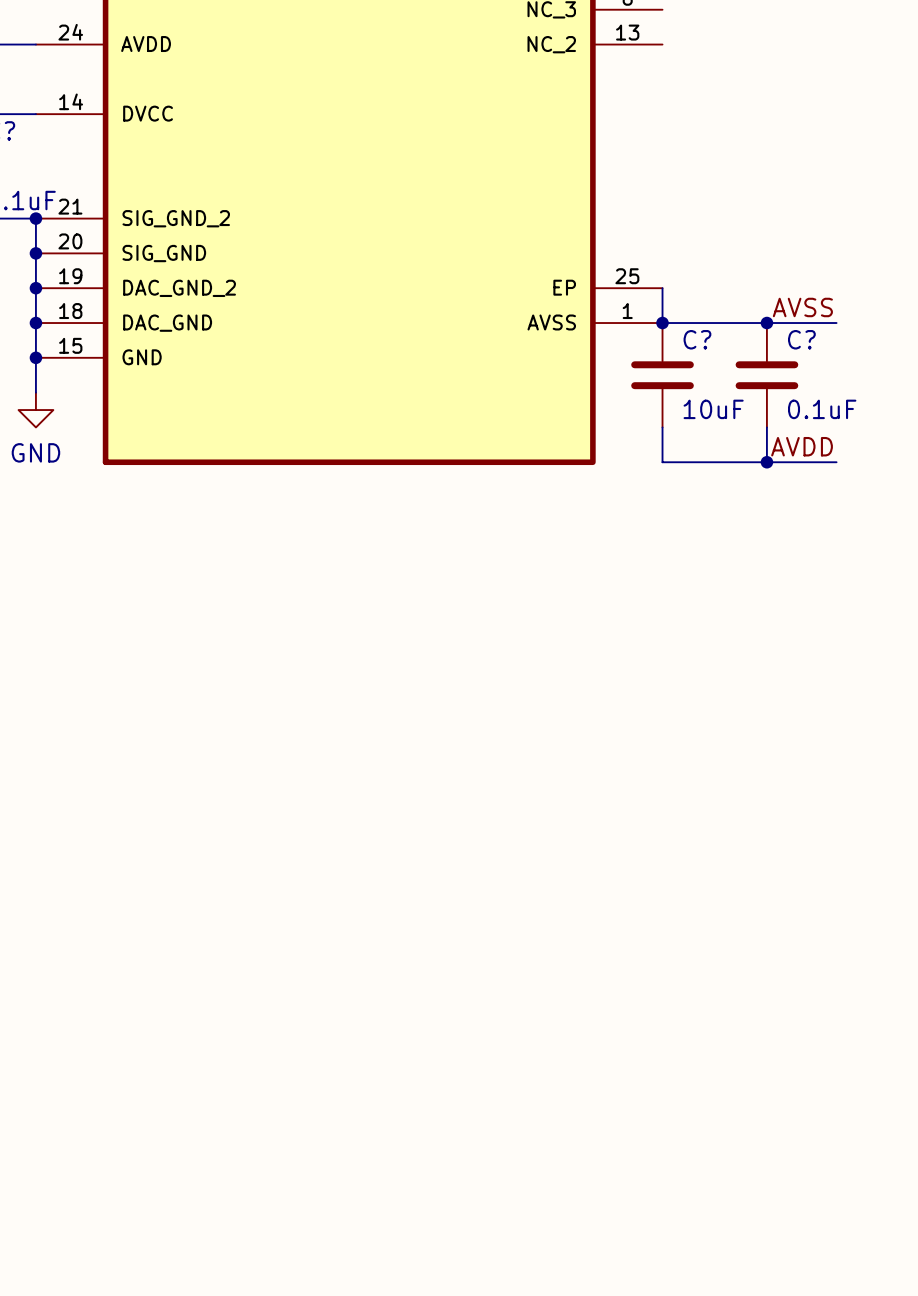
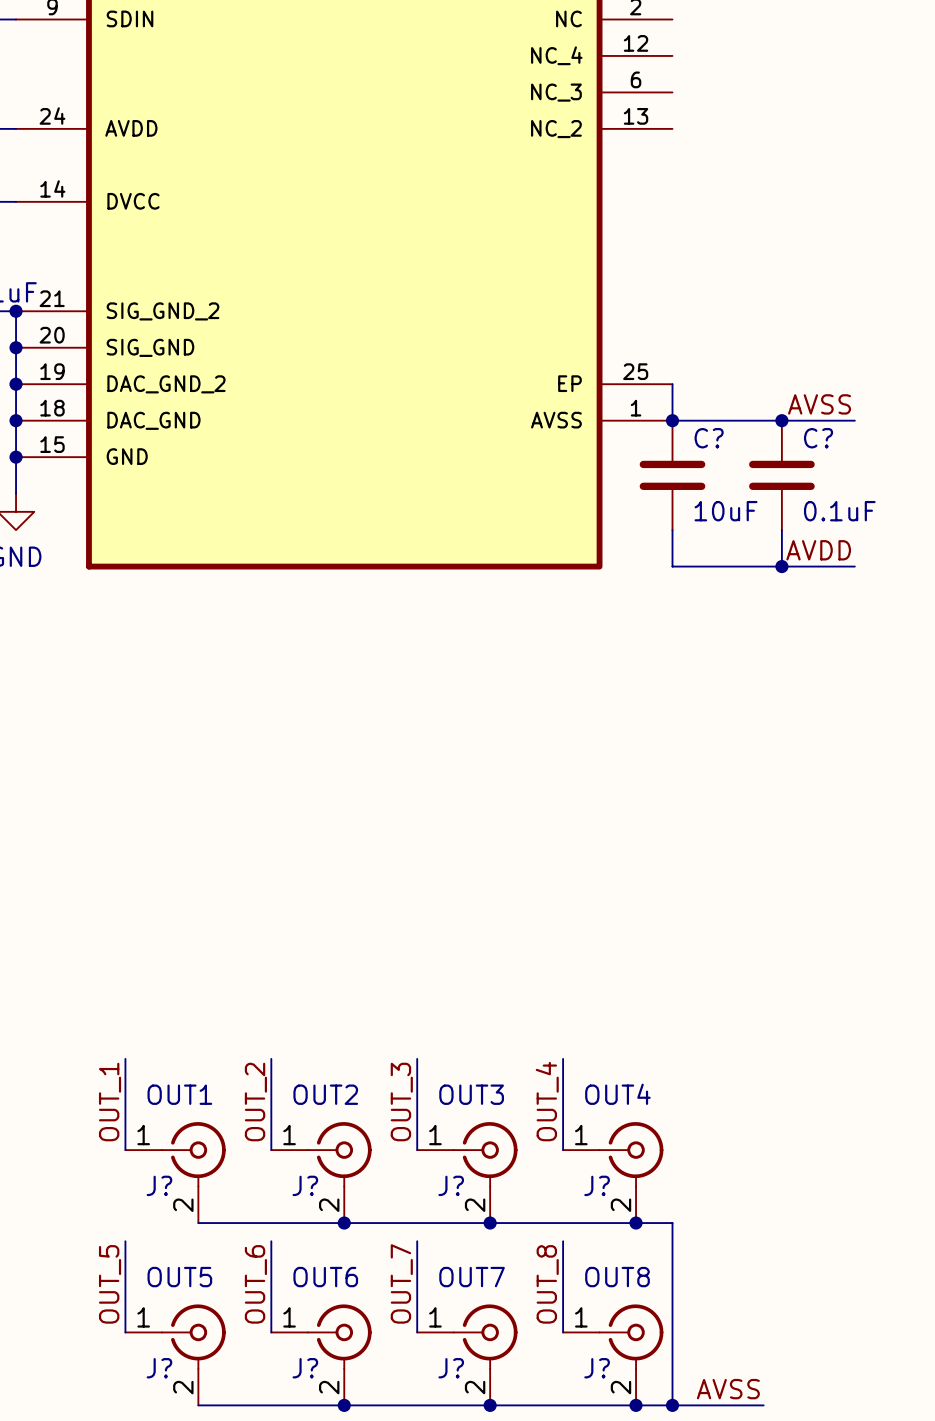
wire: none -> (125, 1058) (125, 1150)
wire: none -> (271, 1058) (271, 1150)
wire: none -> (417, 1058) (417, 1150)
wire: none -> (563, 1058) (563, 1150)
label: none -> OUT_4 (547, 1101)
label: none -> OUT_1 (110, 1102)
label: none -> OUT_2 (255, 1102)
label: none -> OUT_3 (401, 1102)
J?: none -> OUT1 (175, 1172)
J?: none -> OUT2 (321, 1172)
J?: none -> OUT3 (467, 1172)
J?: none -> OUT4 (613, 1172)
wire: none -> (198, 1223) (672, 1223) (672, 1405)
junction: none -> (344, 1223)
junction: none -> (490, 1223)
junction: none -> (636, 1223)
wire: none -> (125, 1241) (125, 1332)
wire: none -> (271, 1241) (271, 1332)
wire: none -> (417, 1241) (417, 1332)
wire: none -> (563, 1241) (563, 1332)
label: none -> OUT_7 (401, 1283)
label: none -> OUT_5 (110, 1284)
label: none -> OUT_6 (255, 1284)
label: none -> OUT_8 (547, 1284)
J?: none -> OUT5 (175, 1354)
J?: none -> OUT6 (321, 1354)
J?: none -> OUT7 (467, 1354)
J?: none -> OUT8 (613, 1354)
label: none -> AVSS (728, 1389)
wire: none -> (198, 1405) (763, 1405)
junction: none -> (344, 1405)
junction: none -> (490, 1405)
junction: none -> (636, 1405)
junction: none -> (672, 1405)

